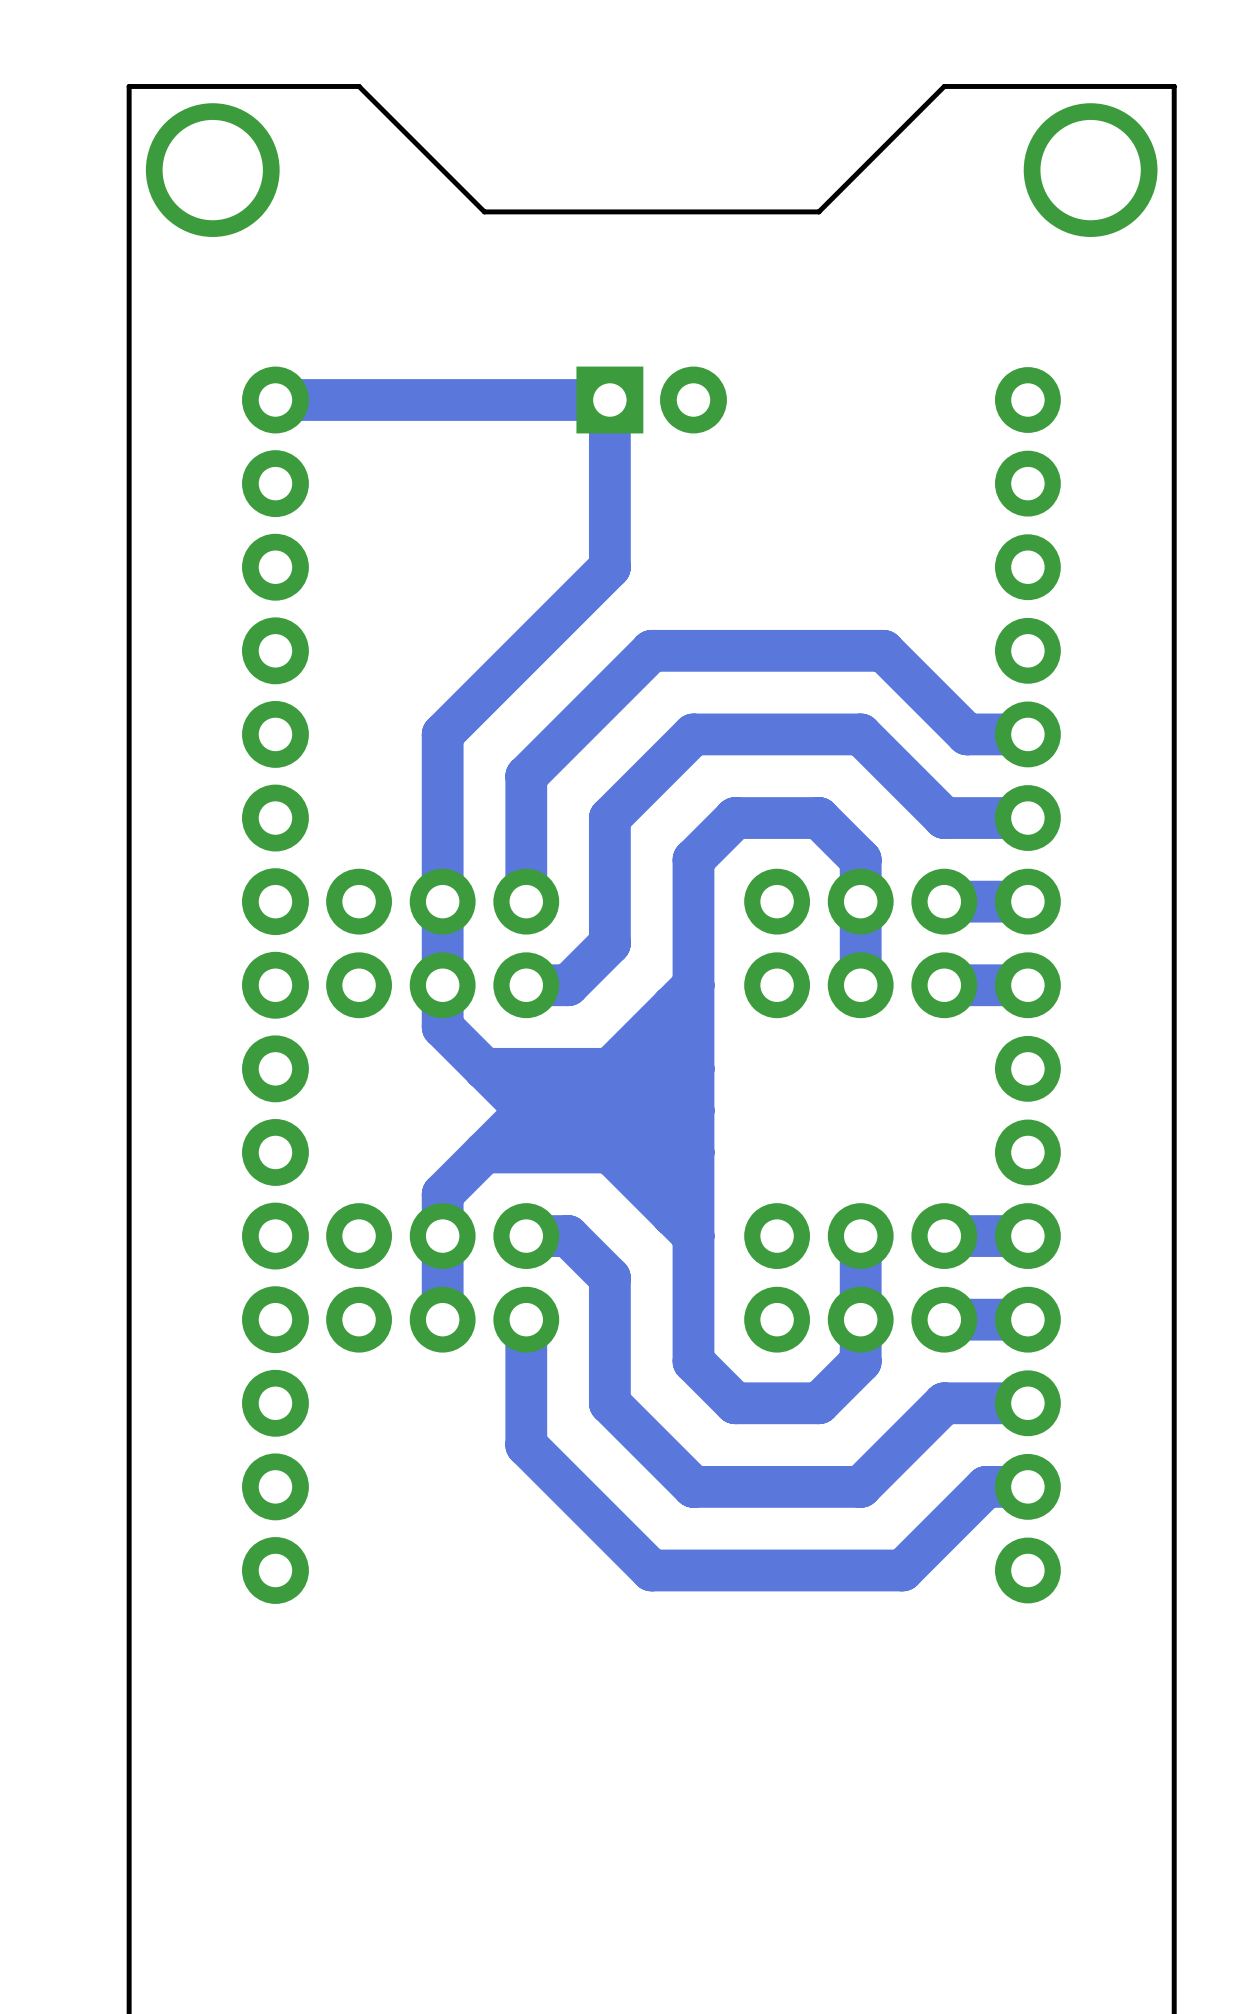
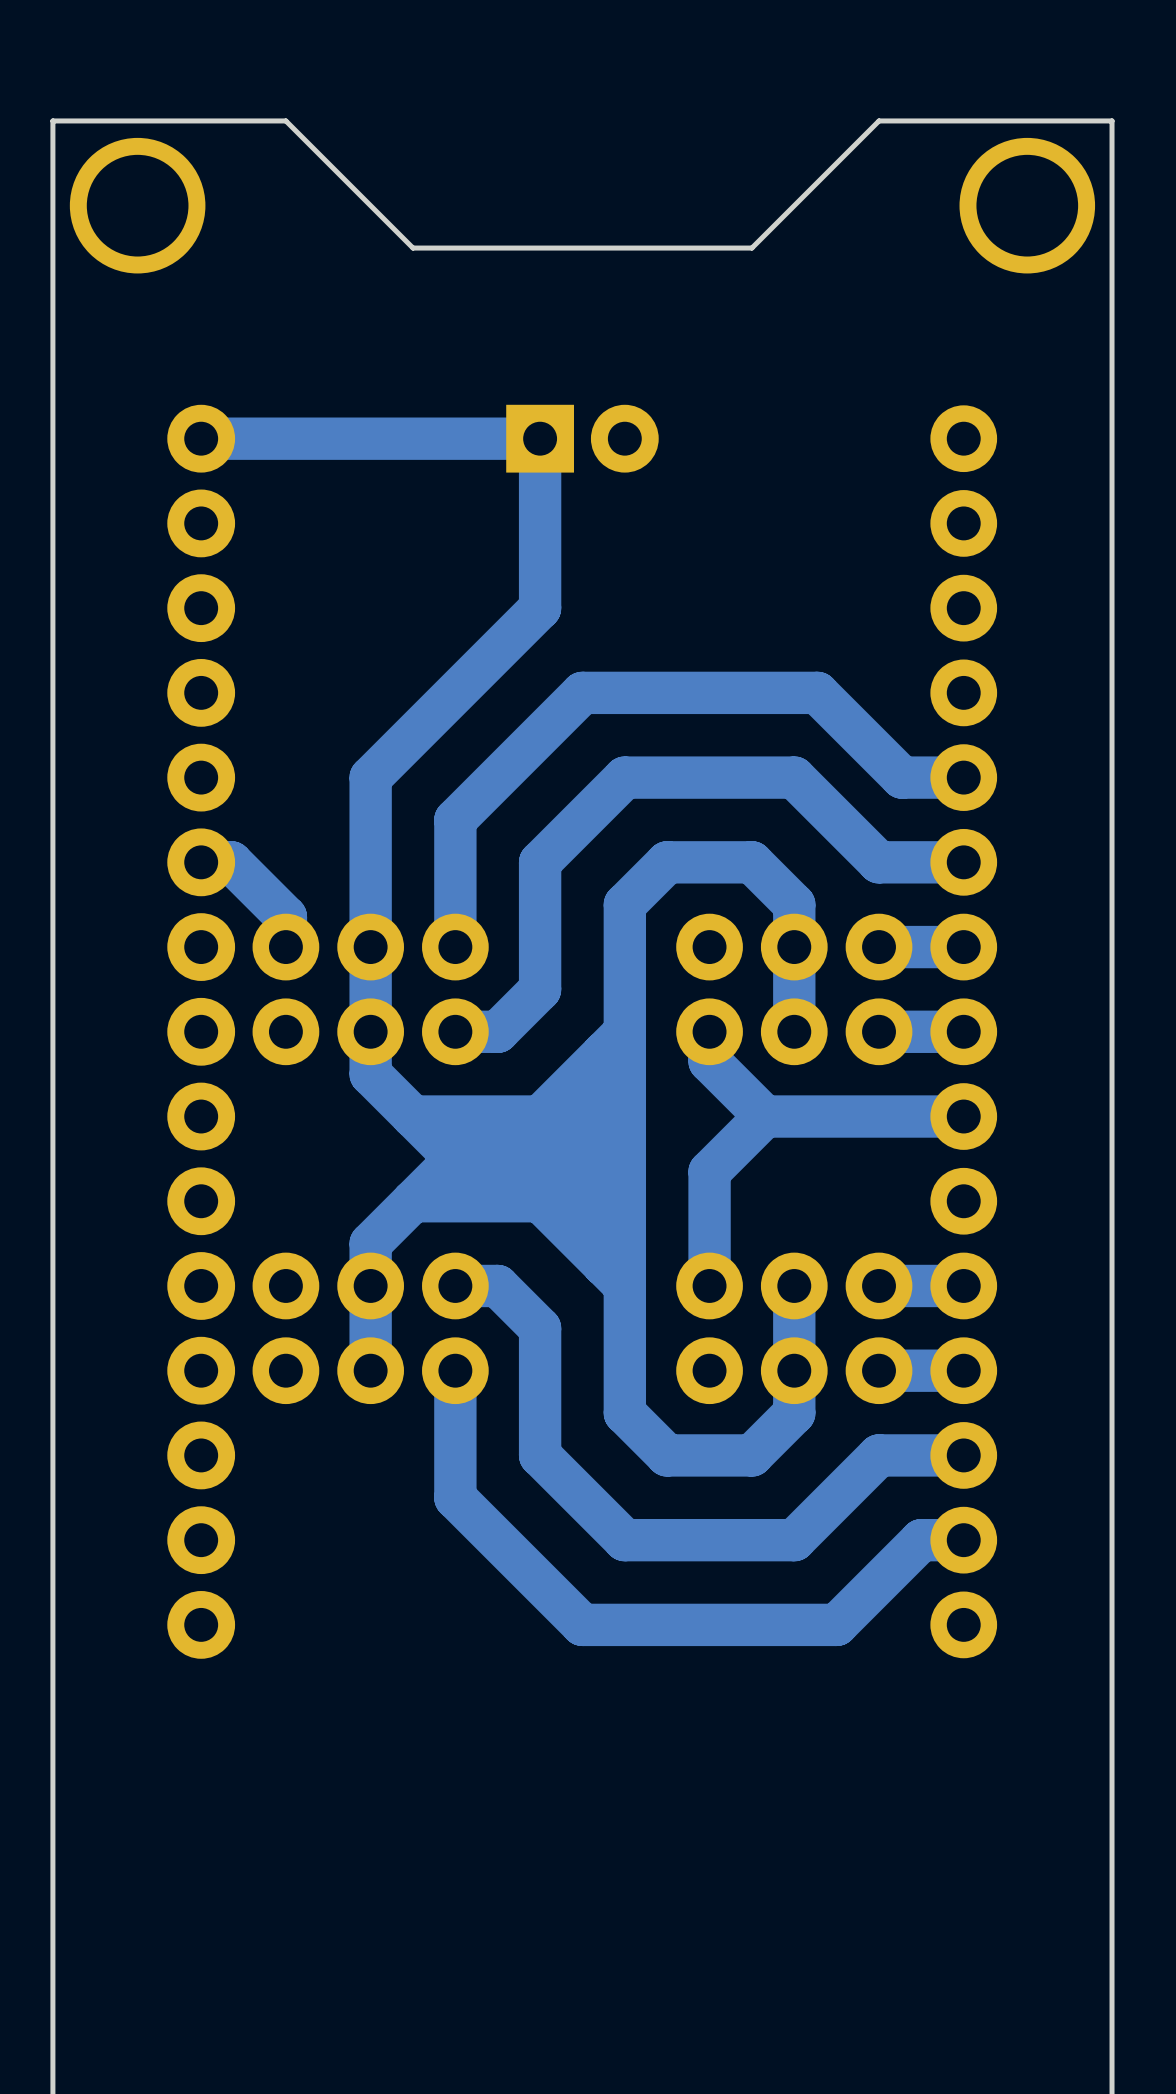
track: none -> (201, 862) (231, 862) (285, 916) (285, 947)
track: none -> (709, 1031) (709, 1061) (764, 1116)
track: none -> (764, 1116) (709, 1171) (709, 1285)
track: none -> (963, 1116) (764, 1116)

